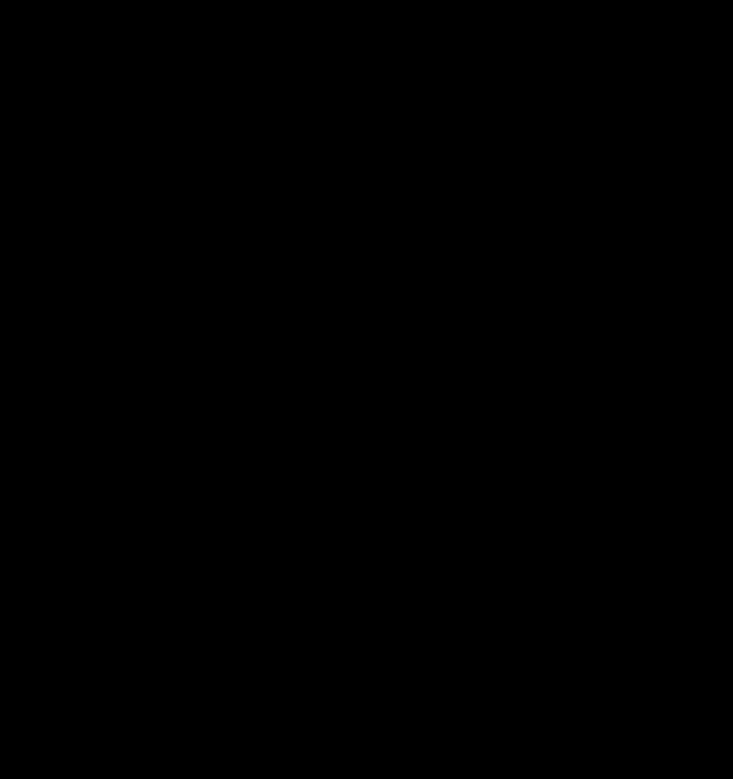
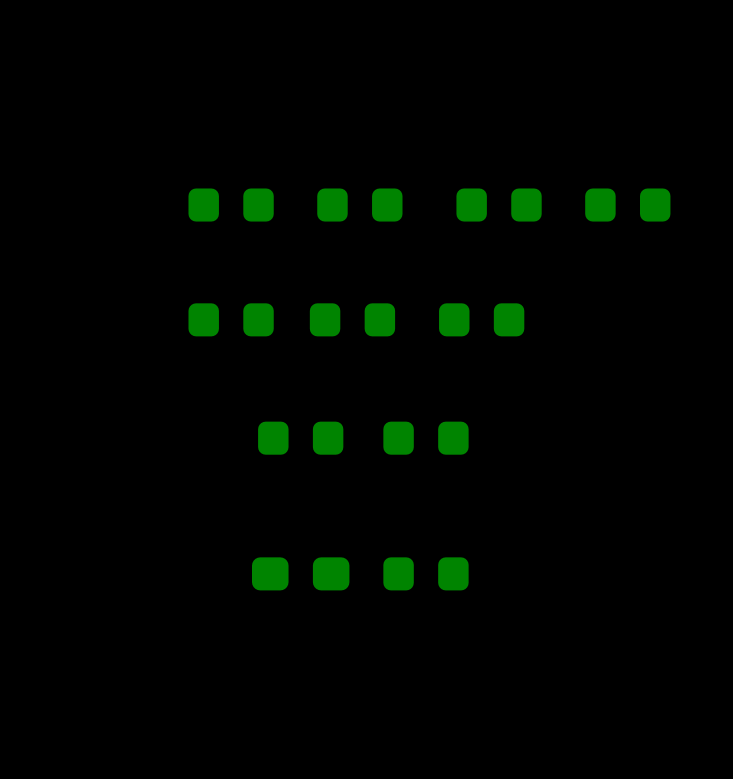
part: none -> (231, 205)
part: none -> (359, 205)
part: none -> (499, 205)
part: none -> (627, 205)
part: none -> (231, 319)
part: none -> (352, 319)
part: none -> (481, 319)
part: none -> (300, 438)
part: none -> (425, 438)
part: none -> (300, 573)
part: none -> (425, 573)

